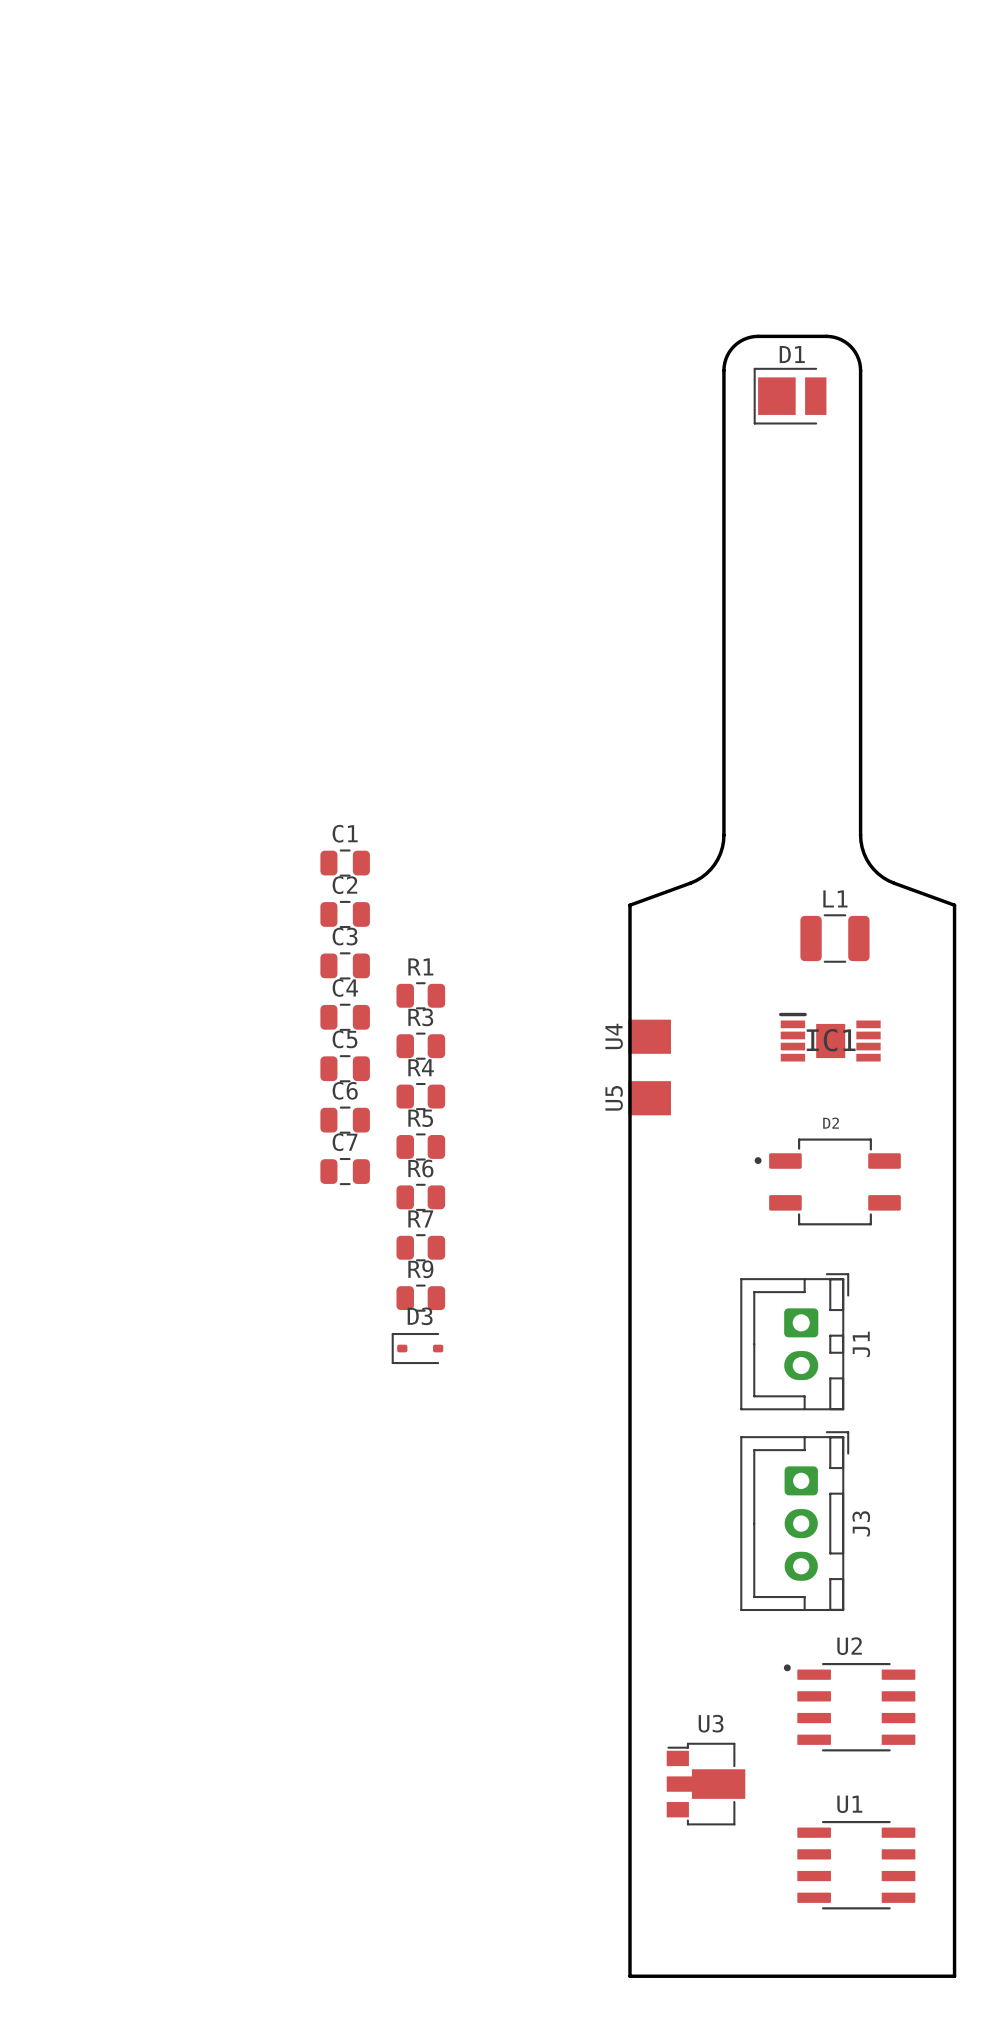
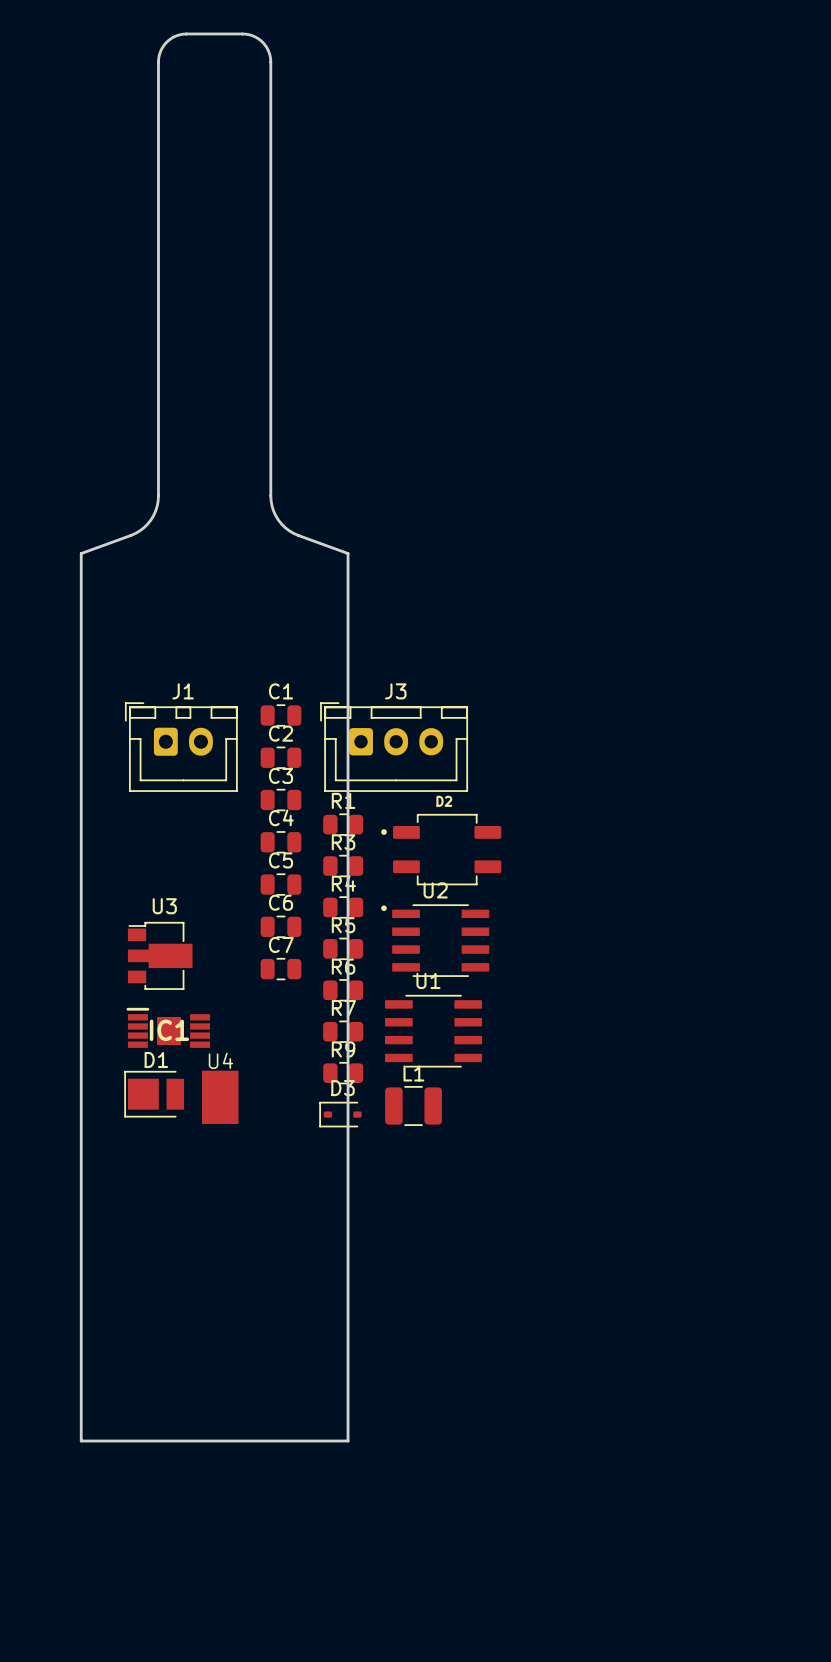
board edge: none -> (186, 33) (248, 34) (262, 42) (269, 52) (270, 62) (271, 501) (278, 520) (289, 530) (348, 553) (348, 1441) (81, 1441) (81, 553) (139, 530) (150, 520) (157, 506) (158, 58) (162, 47) (169, 40) (177, 35) (186, 33)
board edge: (758, 336) (834, 337) (850, 346) (858, 359) (860, 370) (860, 841) (866, 859) (873, 869) (883, 877) (954, 905) (954, 1976) (629, 1976) (629, 905) (701, 877) (714, 864) (722, 847) (724, 366) (727, 355) (736, 343) (746, 338) (758, 336) -> none
D1 position: (790, 396) -> (154, 1094)
L1 position: (834, 938) -> (413, 1106)
U4 footprint: [628, 1019, 671, 1054] -> [202, 1070, 239, 1125]
U4 name position: U4 (614, 1036) -> U4 (220, 1060)
IC1 position: (829, 1037) -> (168, 1027)
U5: (649, 1098) -> none
D2 position: (827, 1181) -> (441, 849)
J1 rotation: 0° (794, 1341) -> 90° counterclockwise (181, 747)
J1 position: (794, 1341) -> (181, 747)
J3 rotation: 0° (794, 1521) -> 90° counterclockwise (394, 747)
J3 position: (794, 1521) -> (394, 747)
U2 position: (849, 1707) -> (435, 940)
U3 position: (706, 1784) -> (160, 955)
U1 position: (856, 1865) -> (433, 1031)

